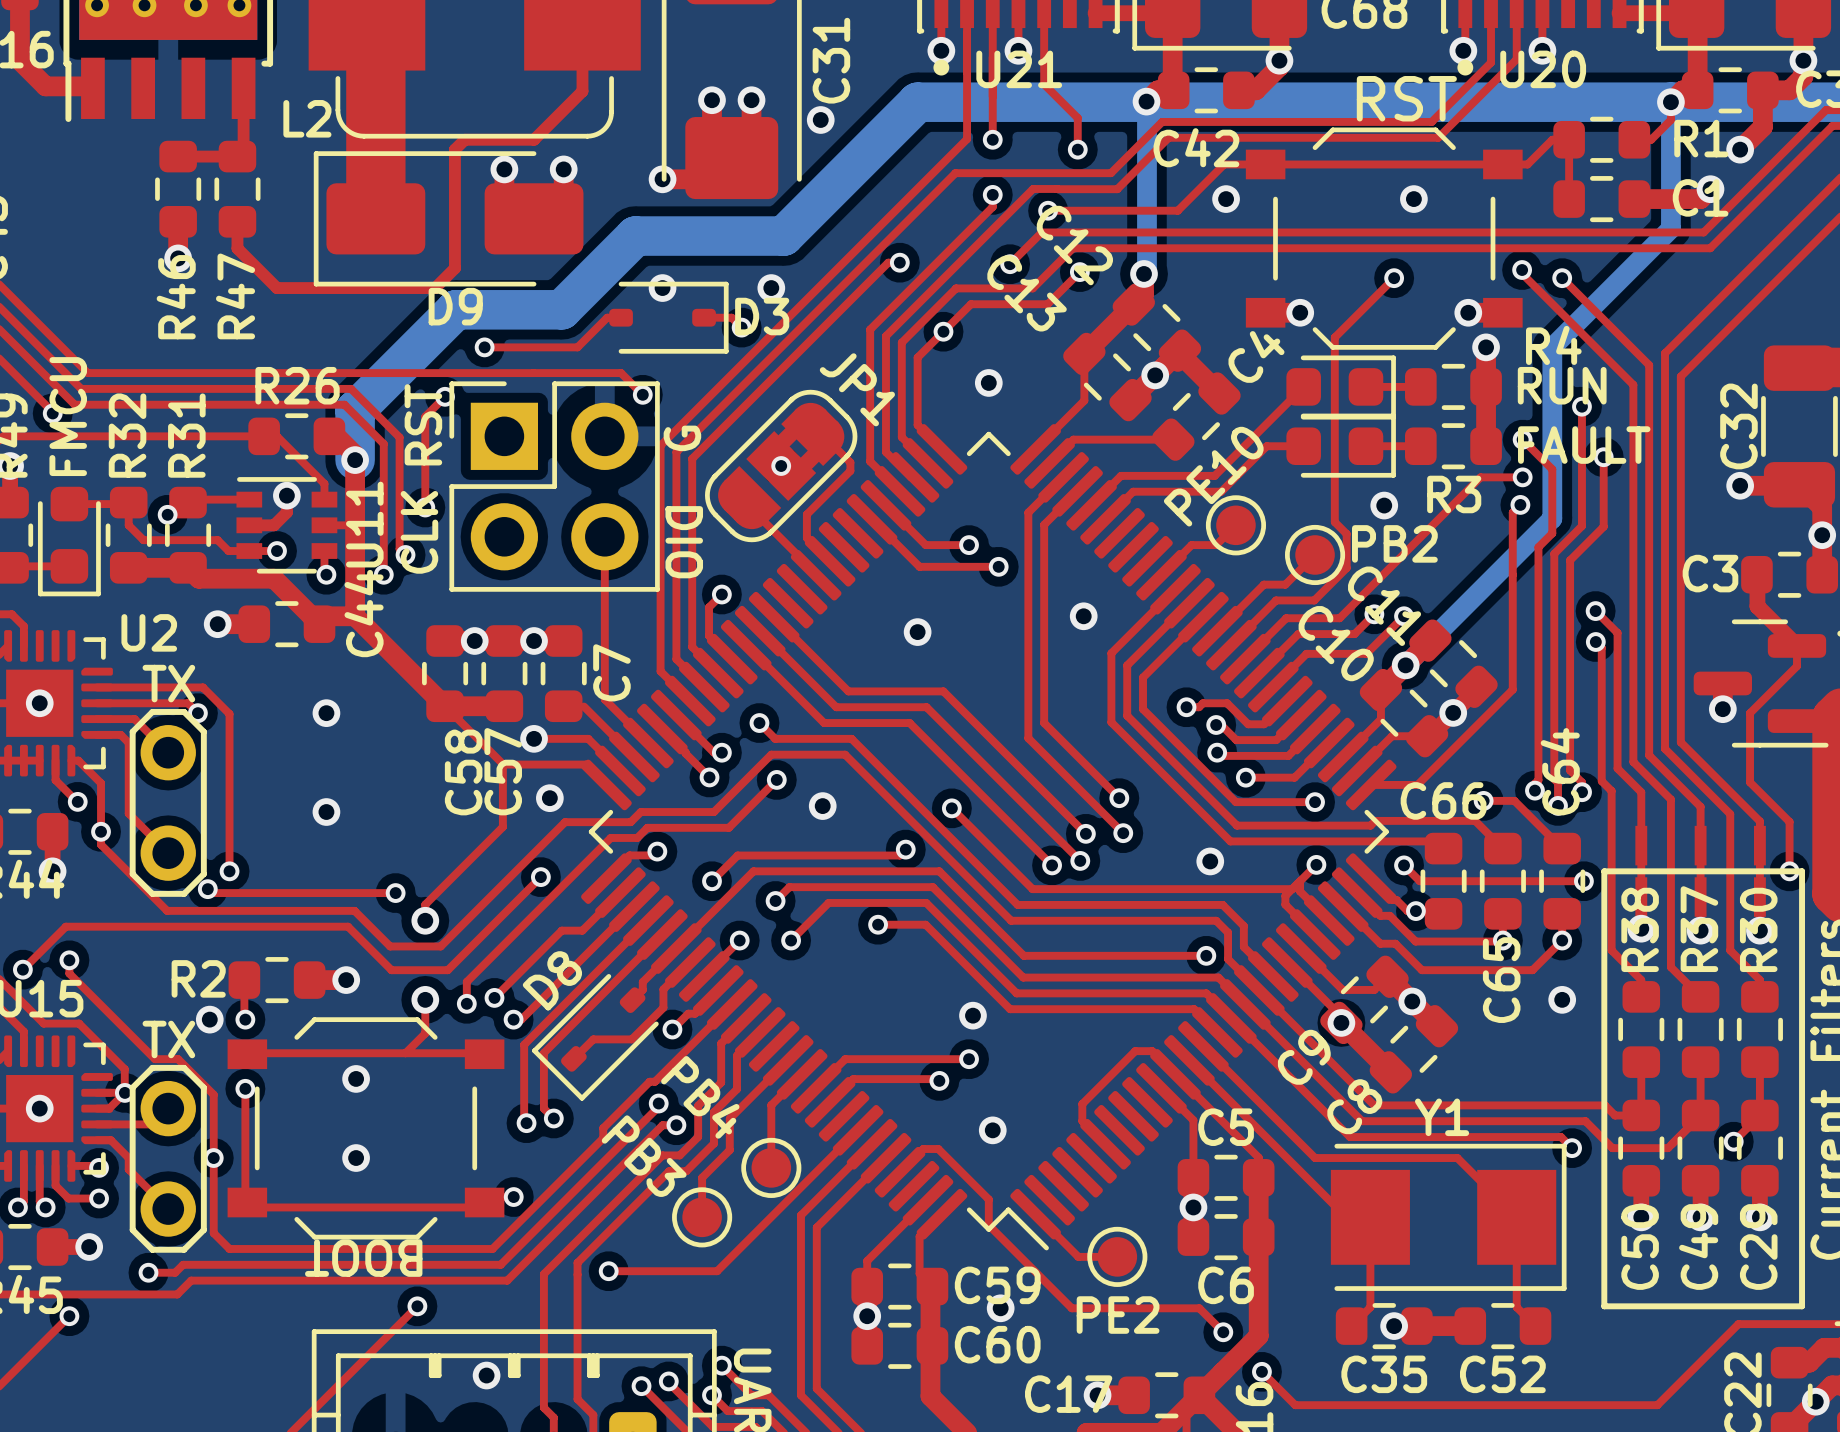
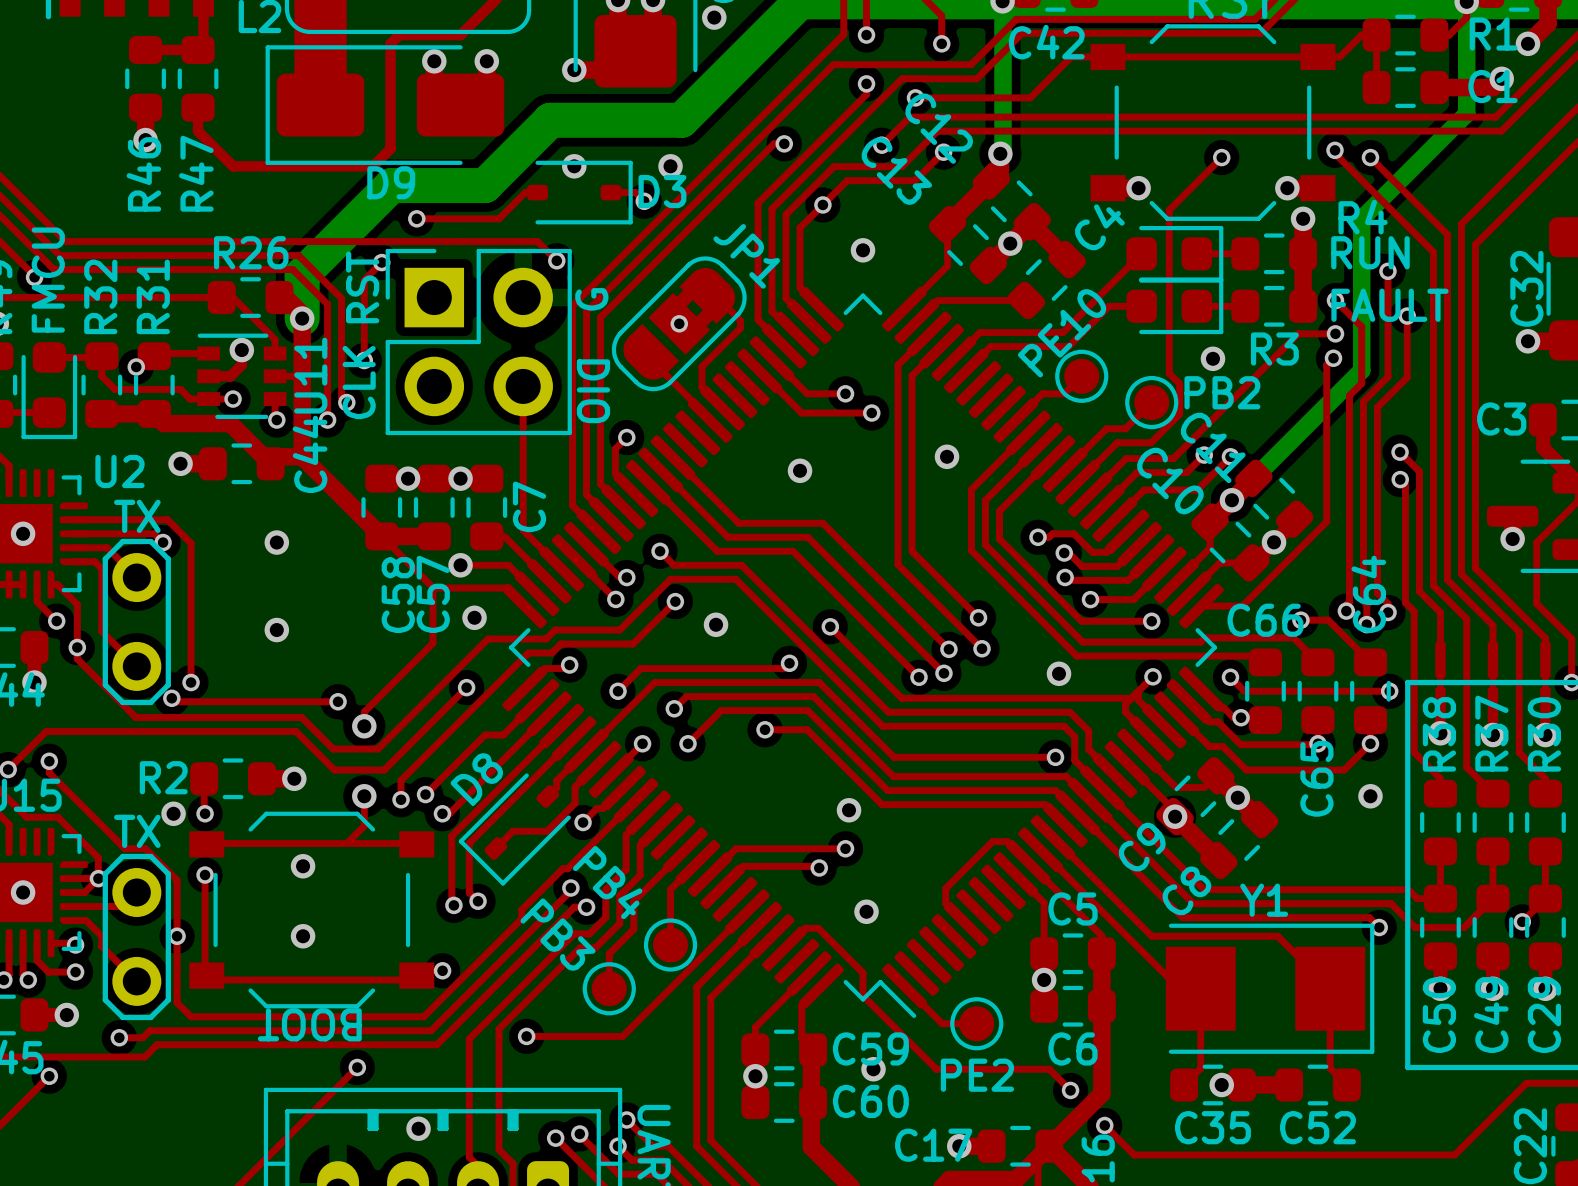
via: (1226, 199) -> none
via: (1413, 199) -> none

